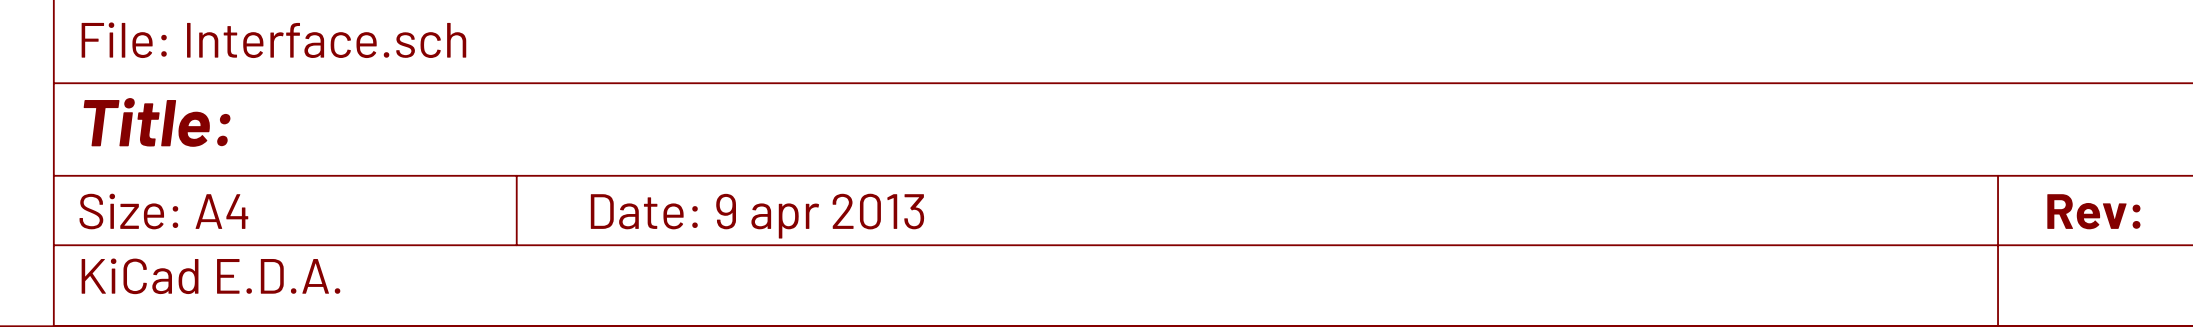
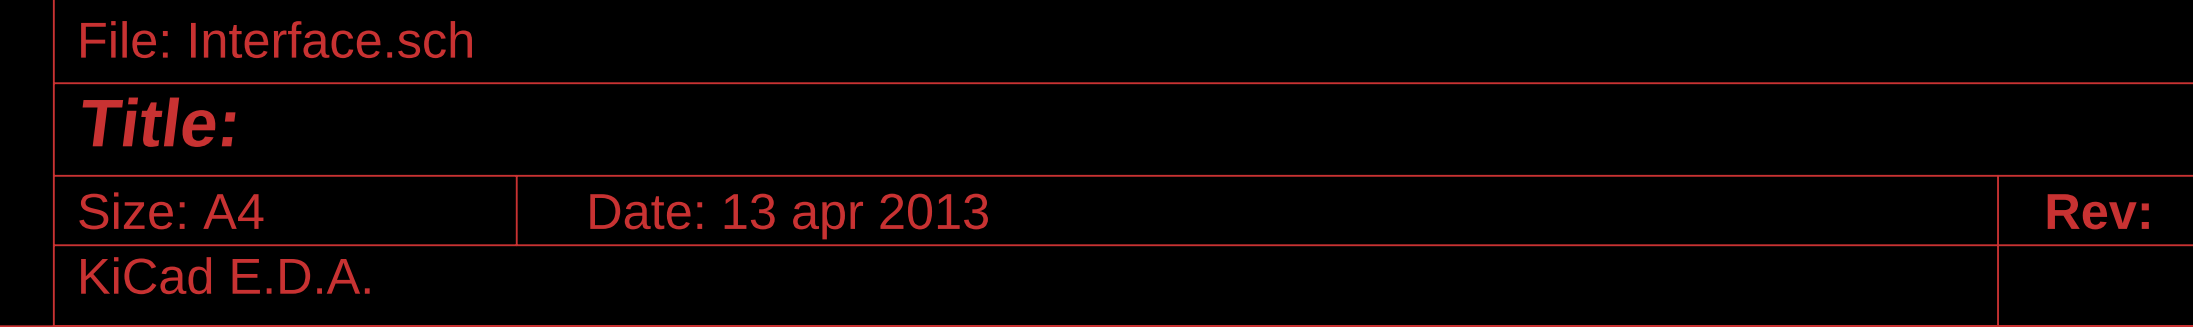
title block: Date: 9 apr 2013 (757, 216) -> Date: 13 apr 2013 (789, 216)

